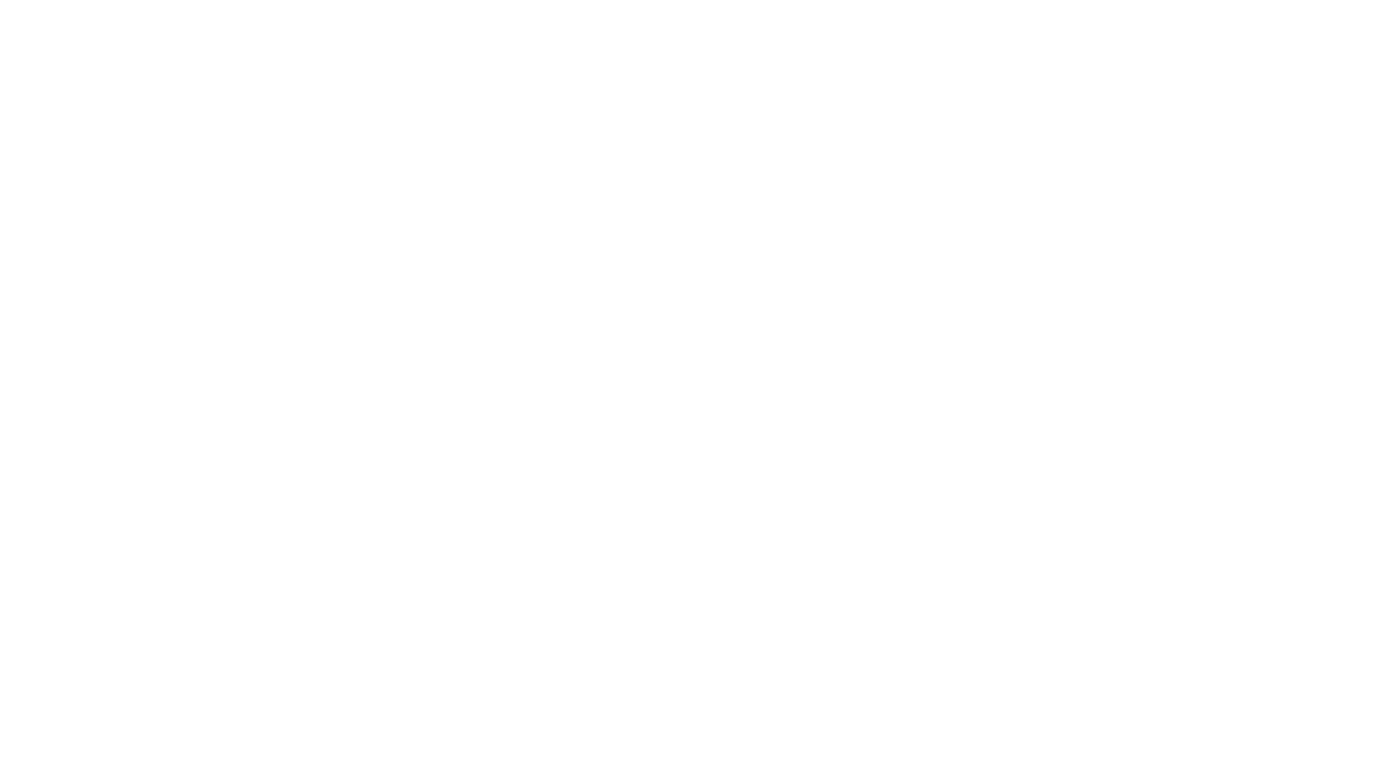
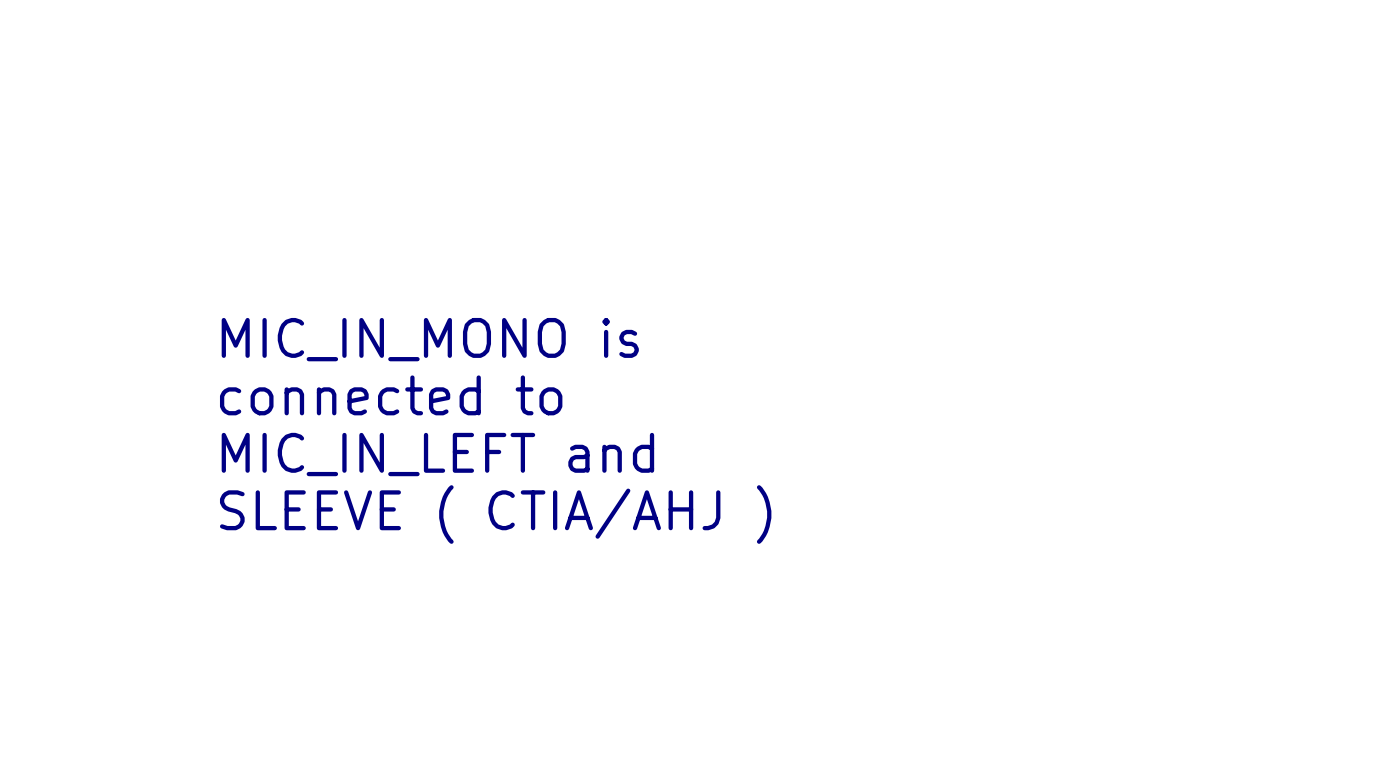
text: none -> MIC_IN_MONO is (430, 339)
text: none -> connected to (391, 395)
text: none -> MIC_IN_LEFT and (437, 454)
text: none -> SLEEVE ( CTIA/AHJ ) (495, 514)

